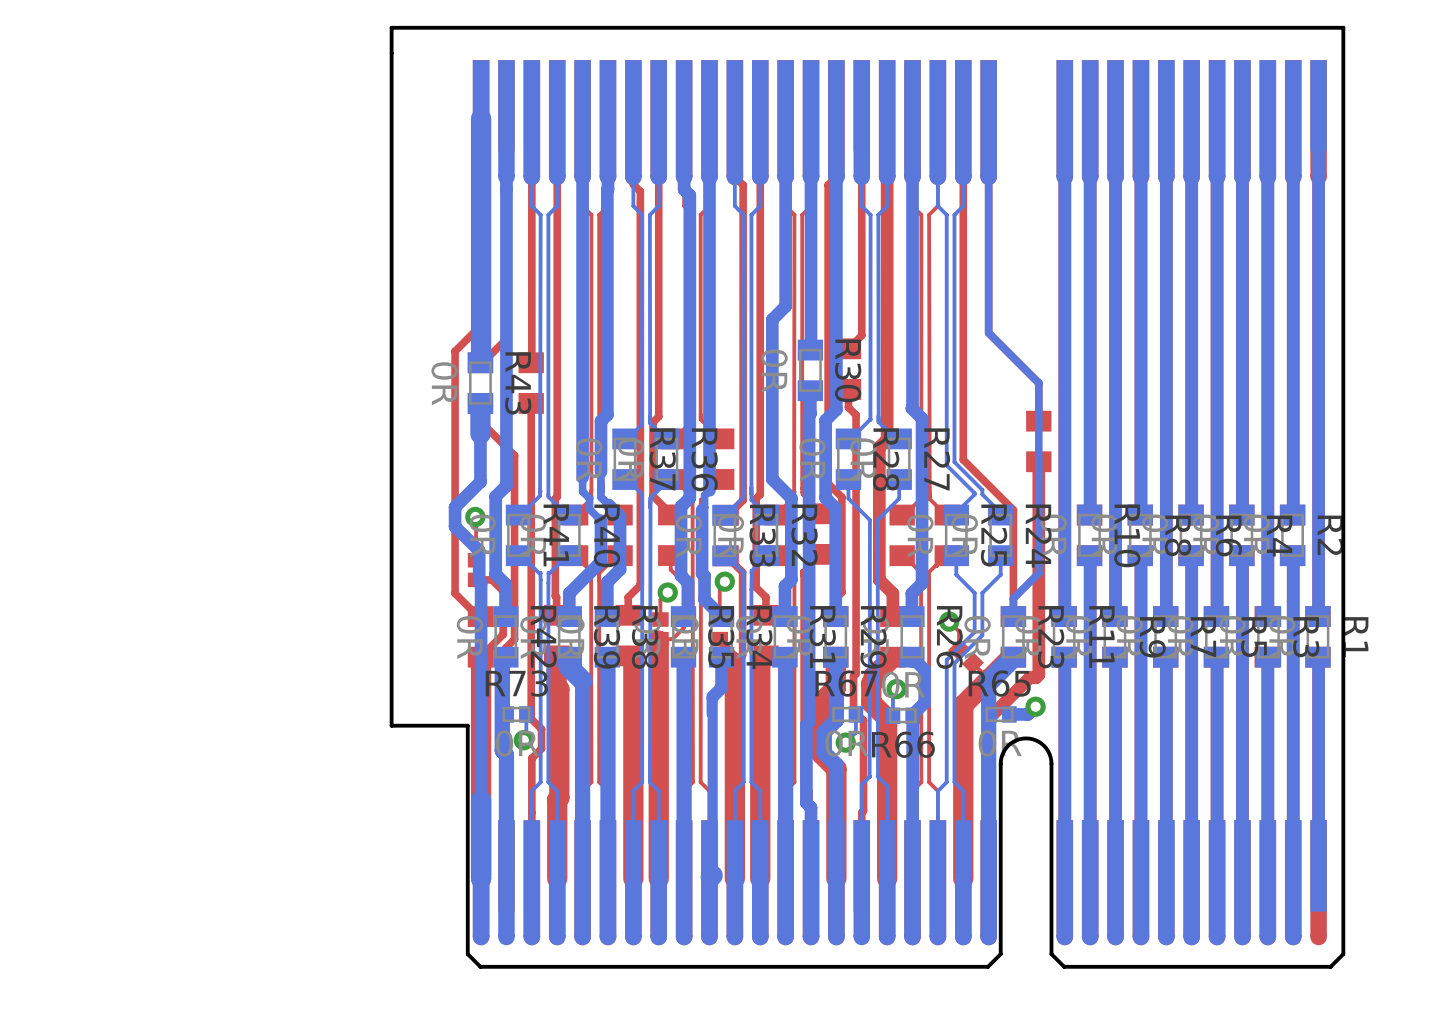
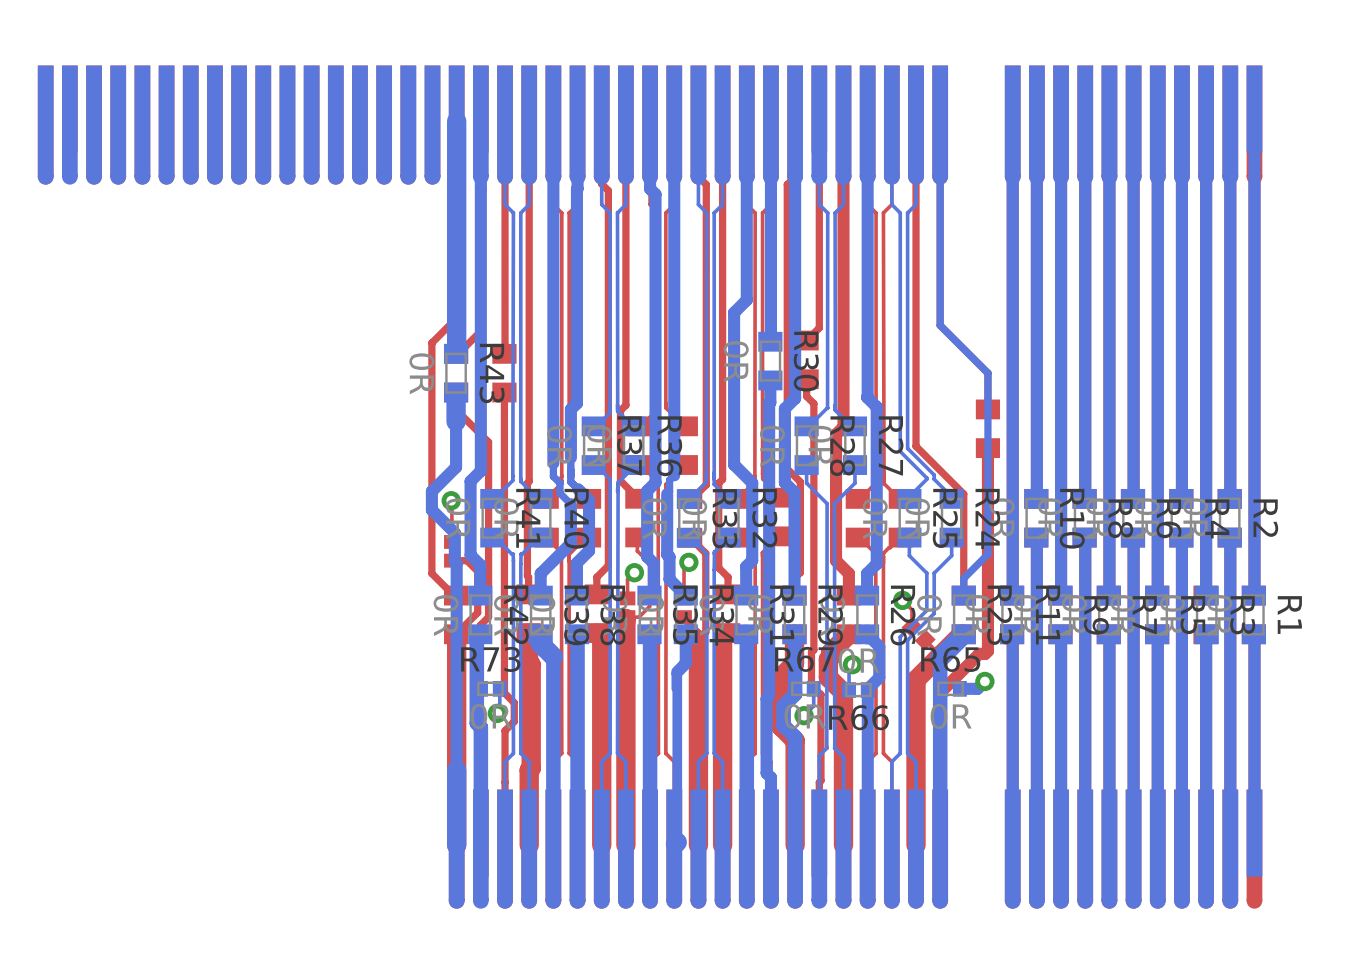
board edge: (1343, 27) (391, 27) (391, 725) (467, 725) (467, 954) (480, 966) (988, 966) (1000, 954) (1000, 760) (1008, 745) (1016, 740) (1026, 738) (1035, 740) (1044, 745) (1051, 760) (1051, 954) (1064, 966) (1330, 966) (1343, 954) (1343, 27) -> none
part: none -> (650, 125)

